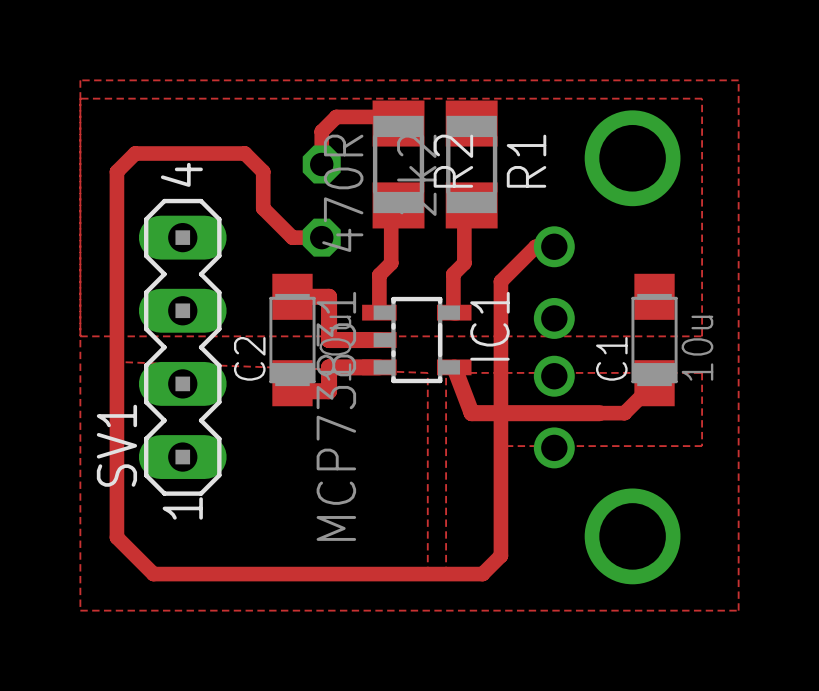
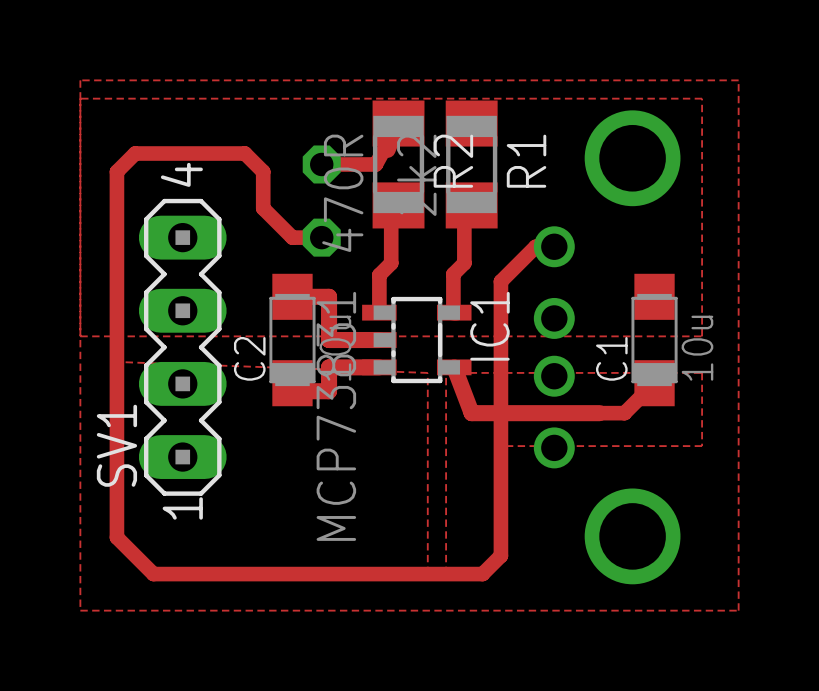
top track: (398, 123) (391, 116) (336, 116) (321, 131) (321, 164) -> (387, 149) (398, 123) (375, 164) (321, 164)

